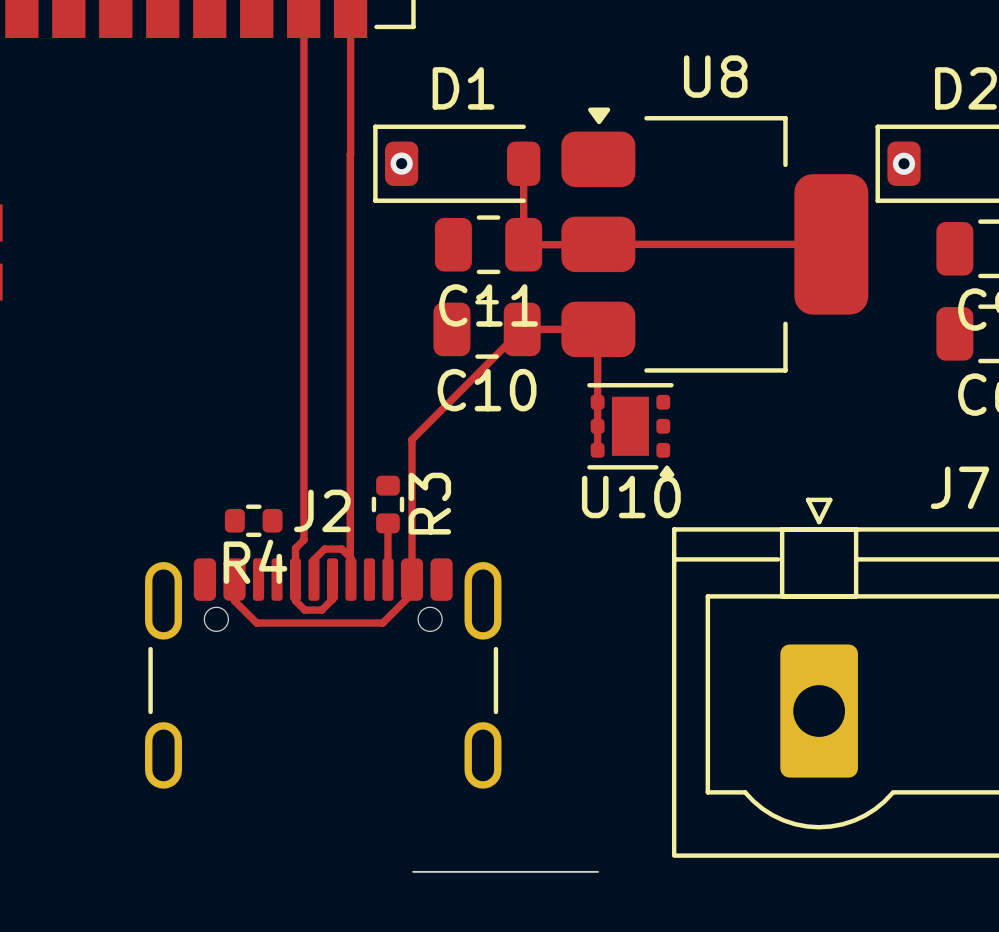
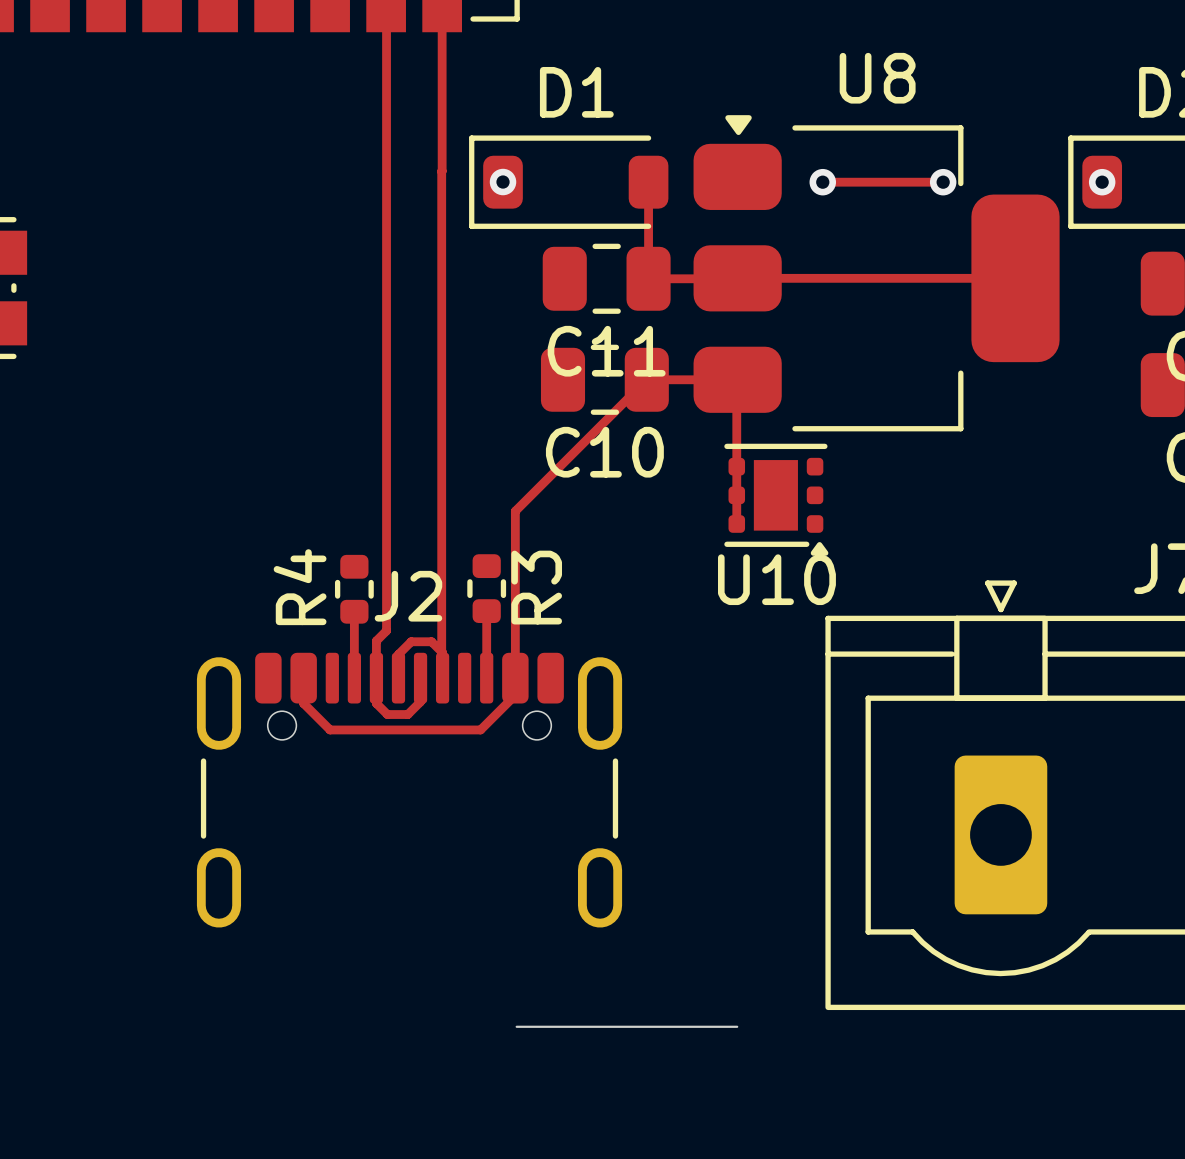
track: none -> (822, 182) (943, 182)
via: none -> (822, 182)
via: none -> (943, 182)
R4 rotation: 0° (253, 520) -> 90° clockwise (354, 589)
track: none -> (354, 611) (354, 678)

